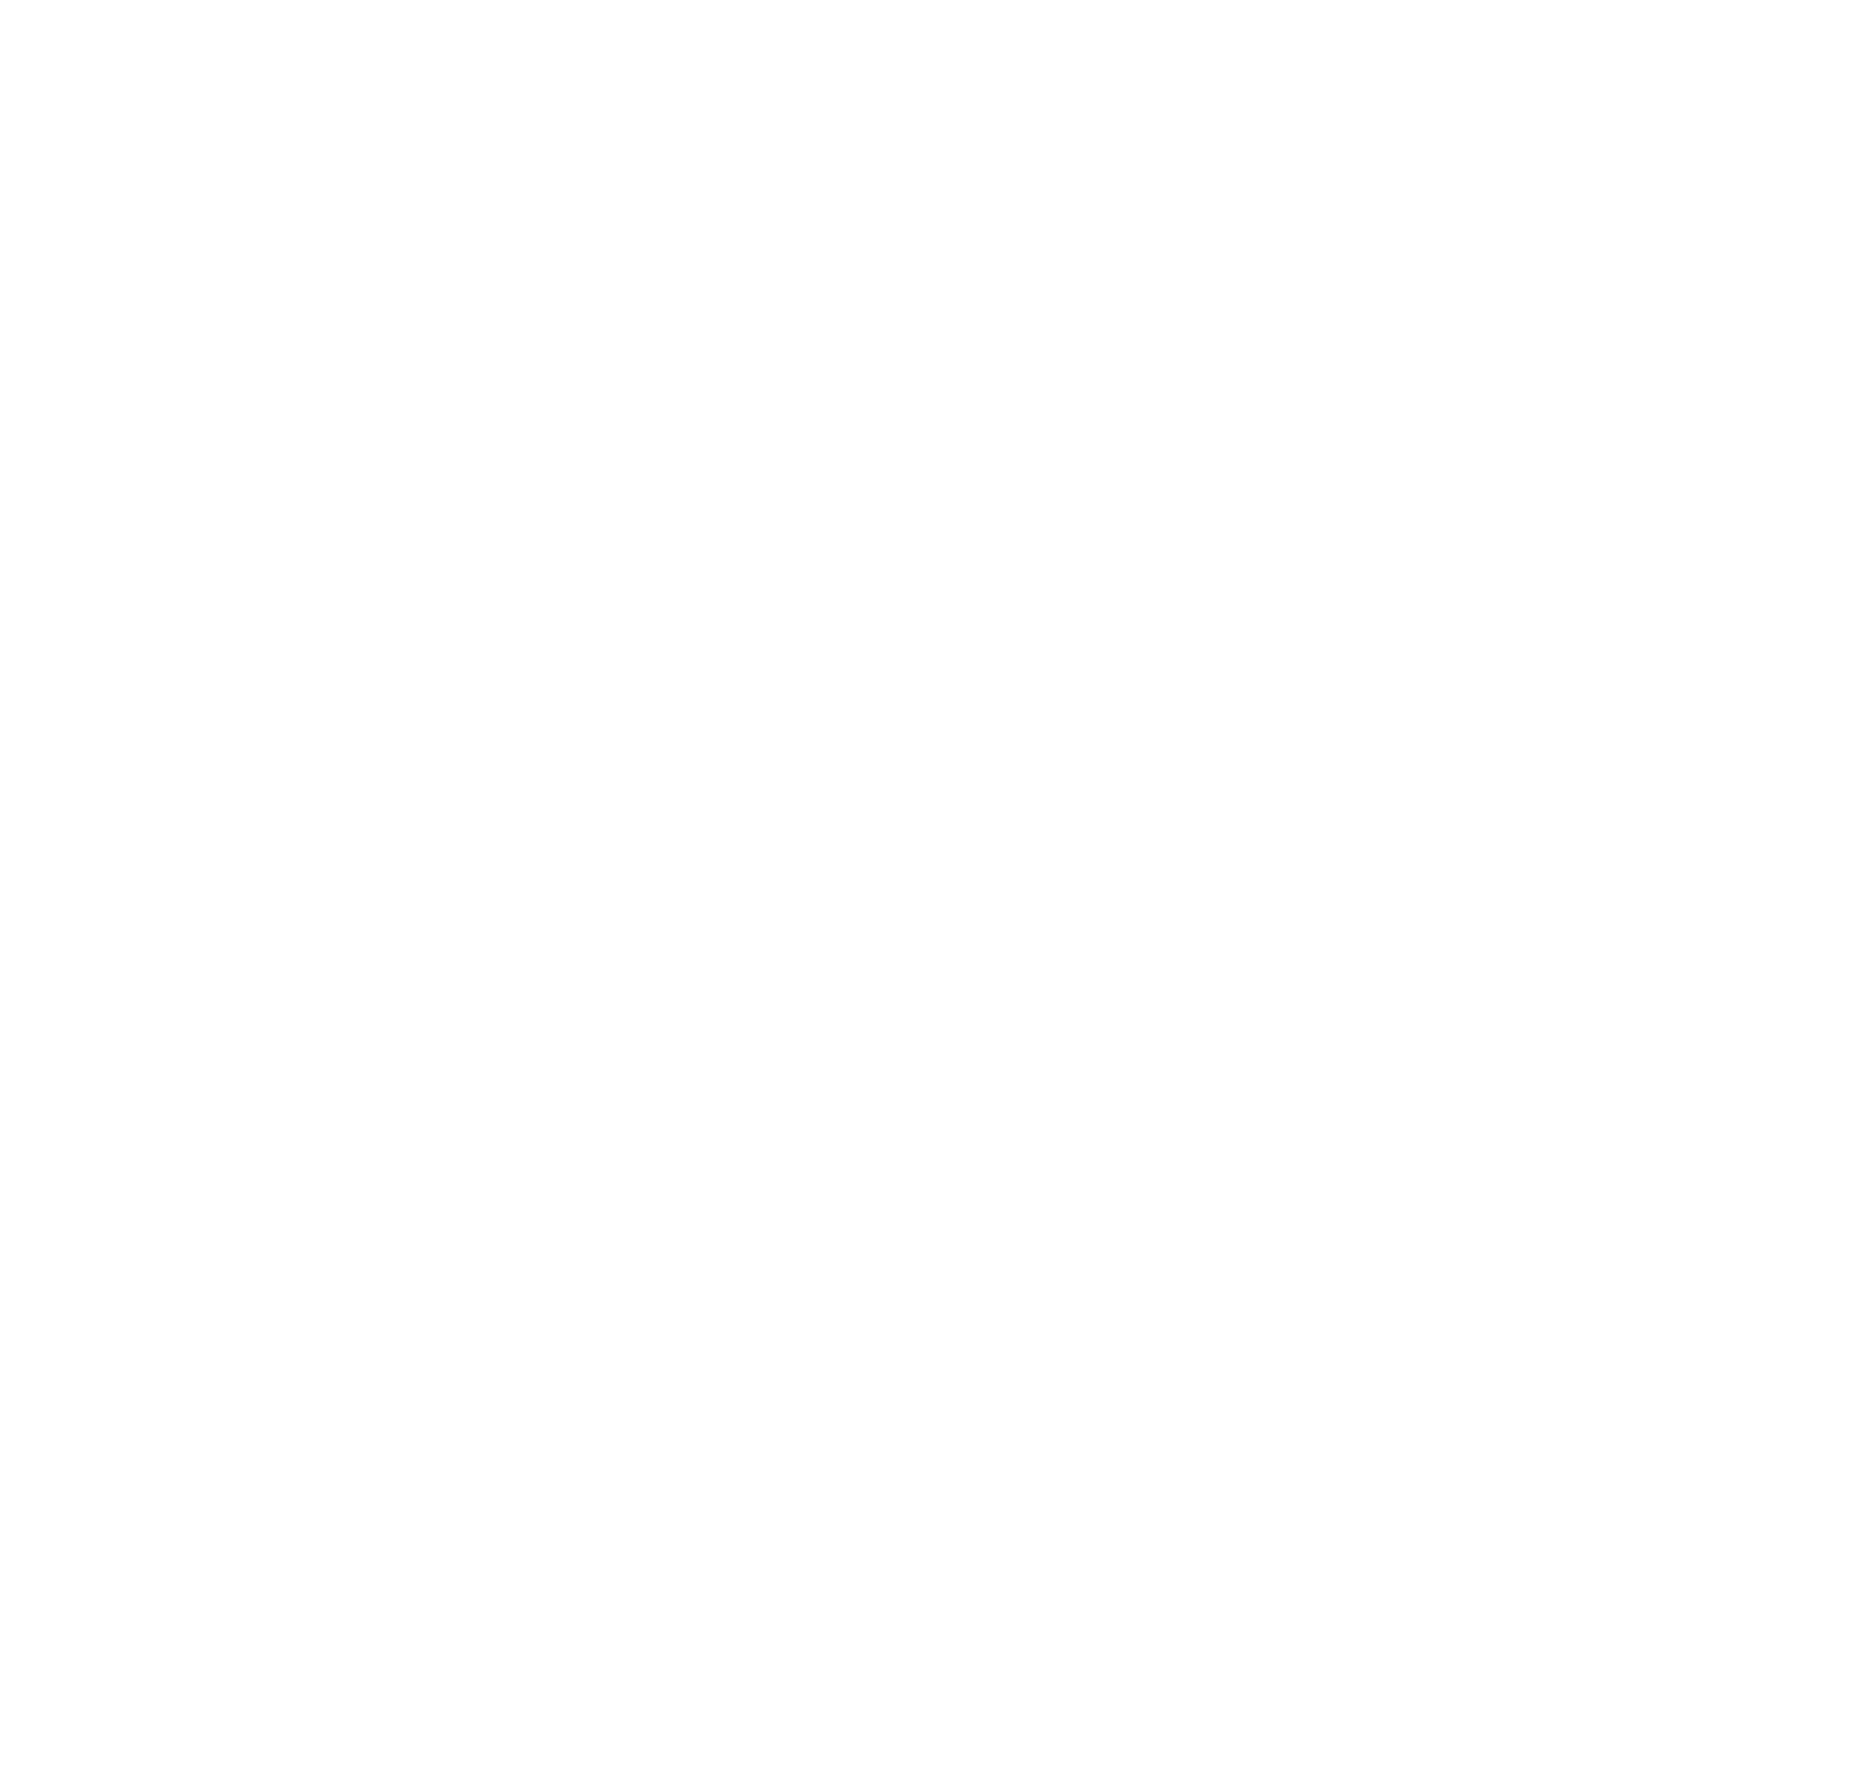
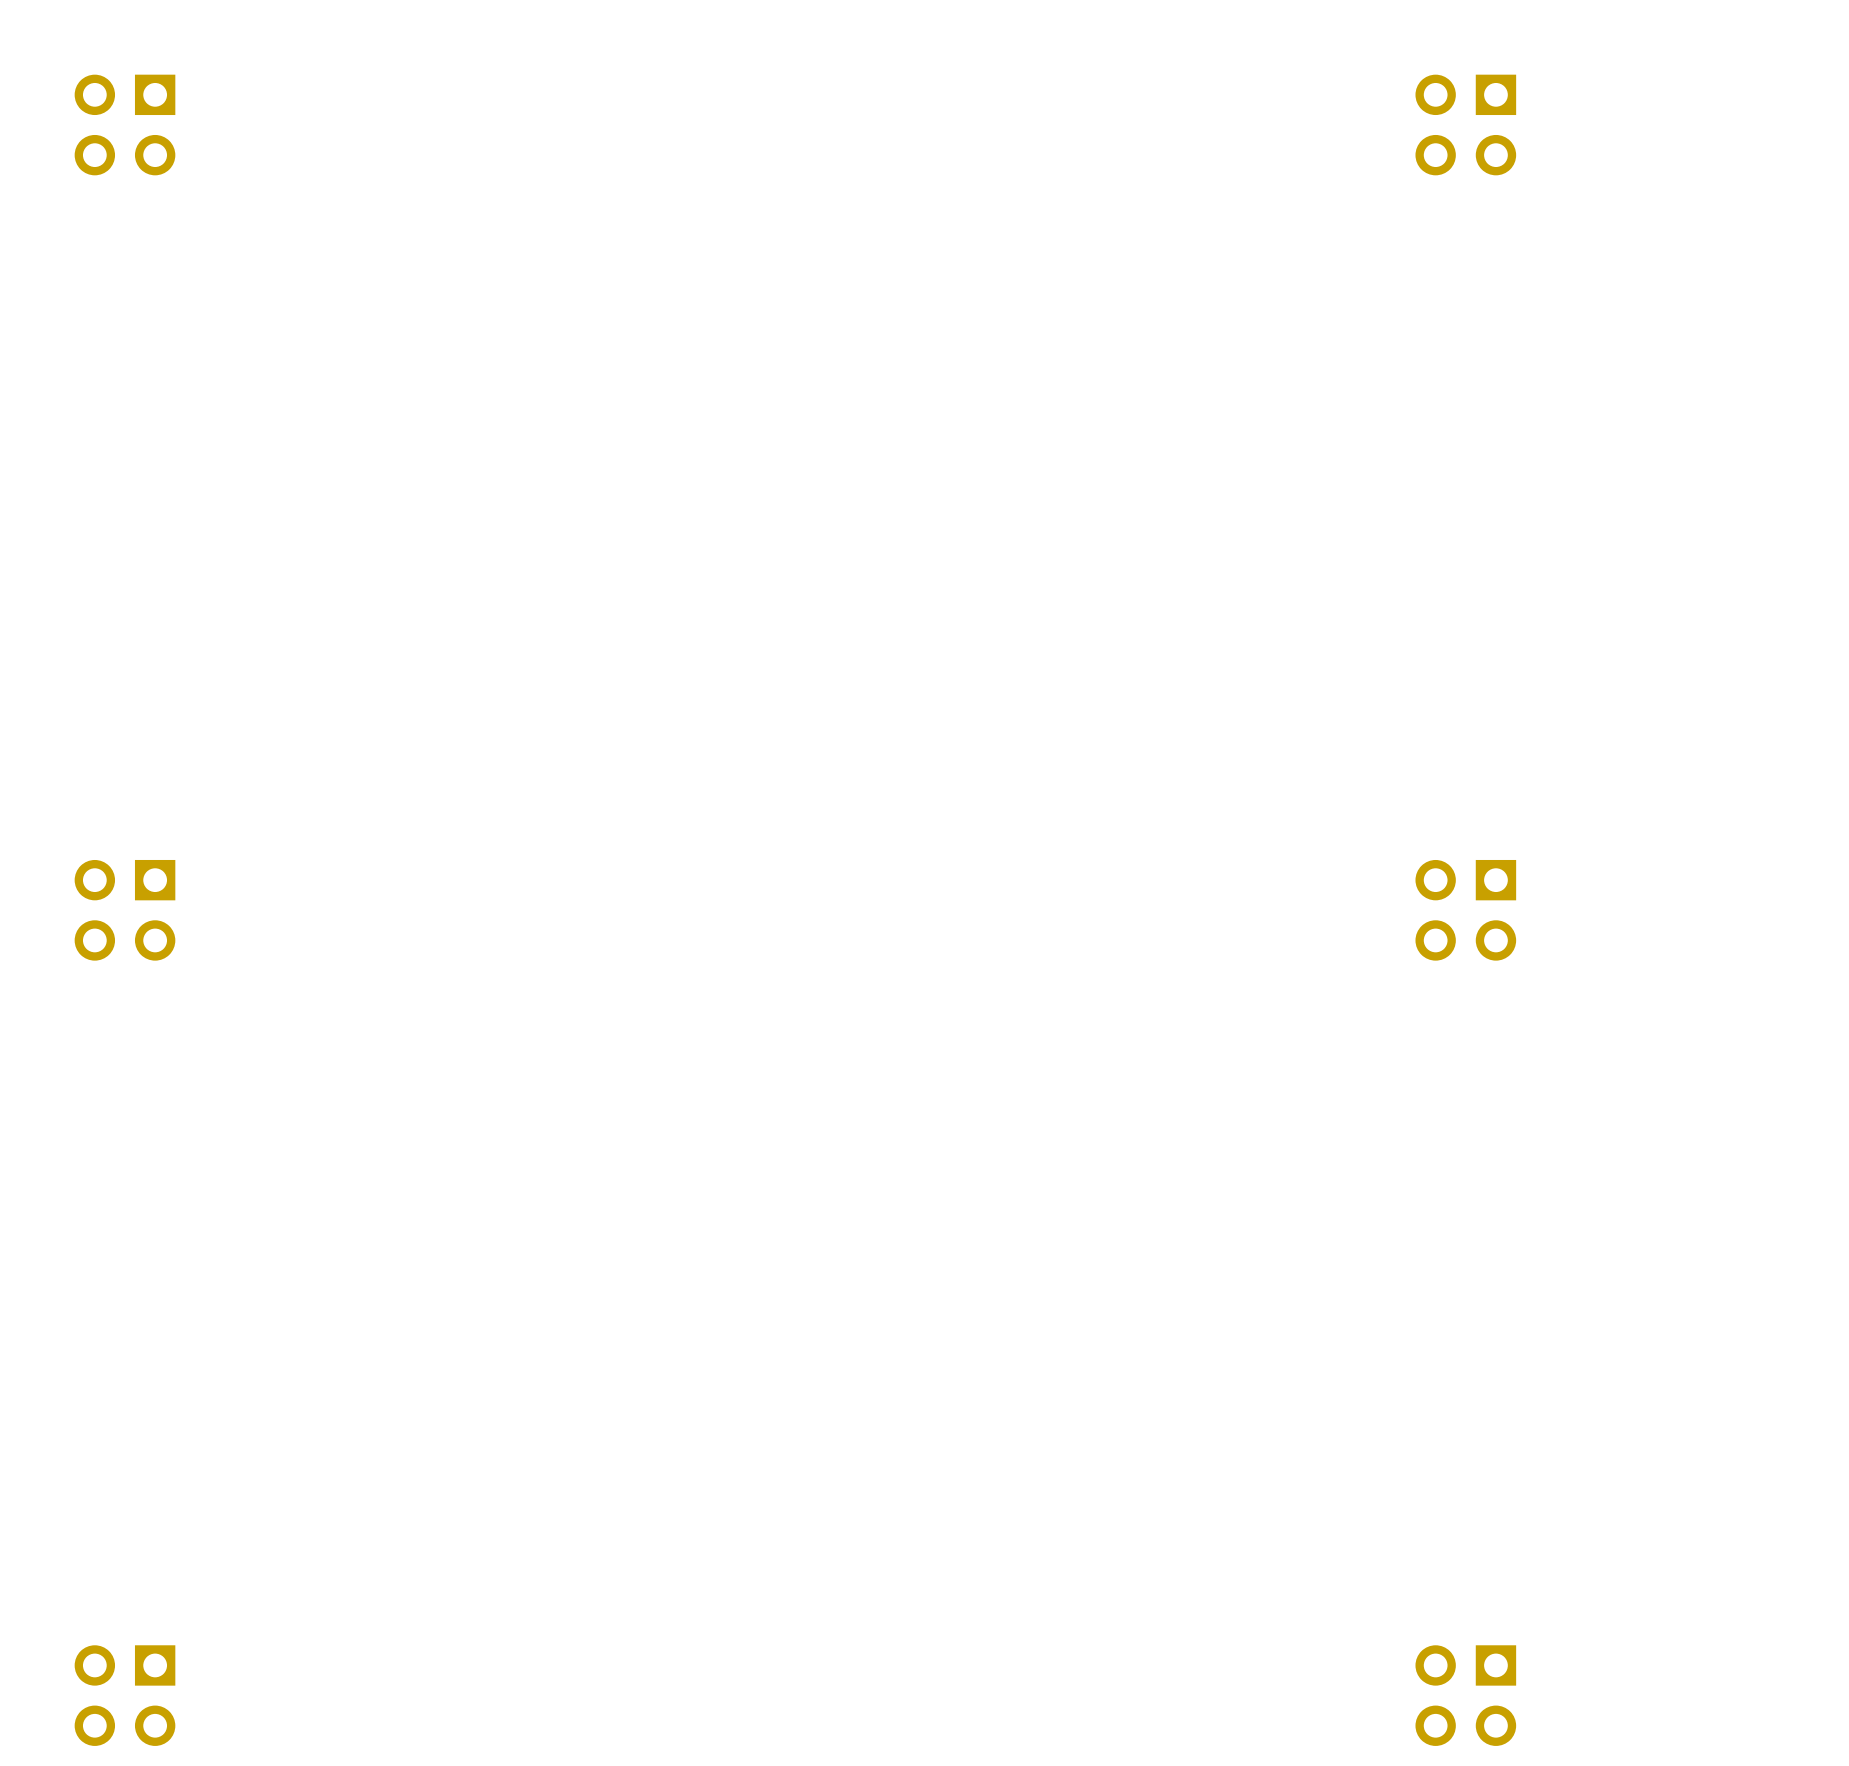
part: none -> (124, 124)
part: none -> (1465, 124)
part: none -> (124, 910)
part: none -> (1465, 910)
part: none -> (124, 1695)
part: none -> (1465, 1695)

